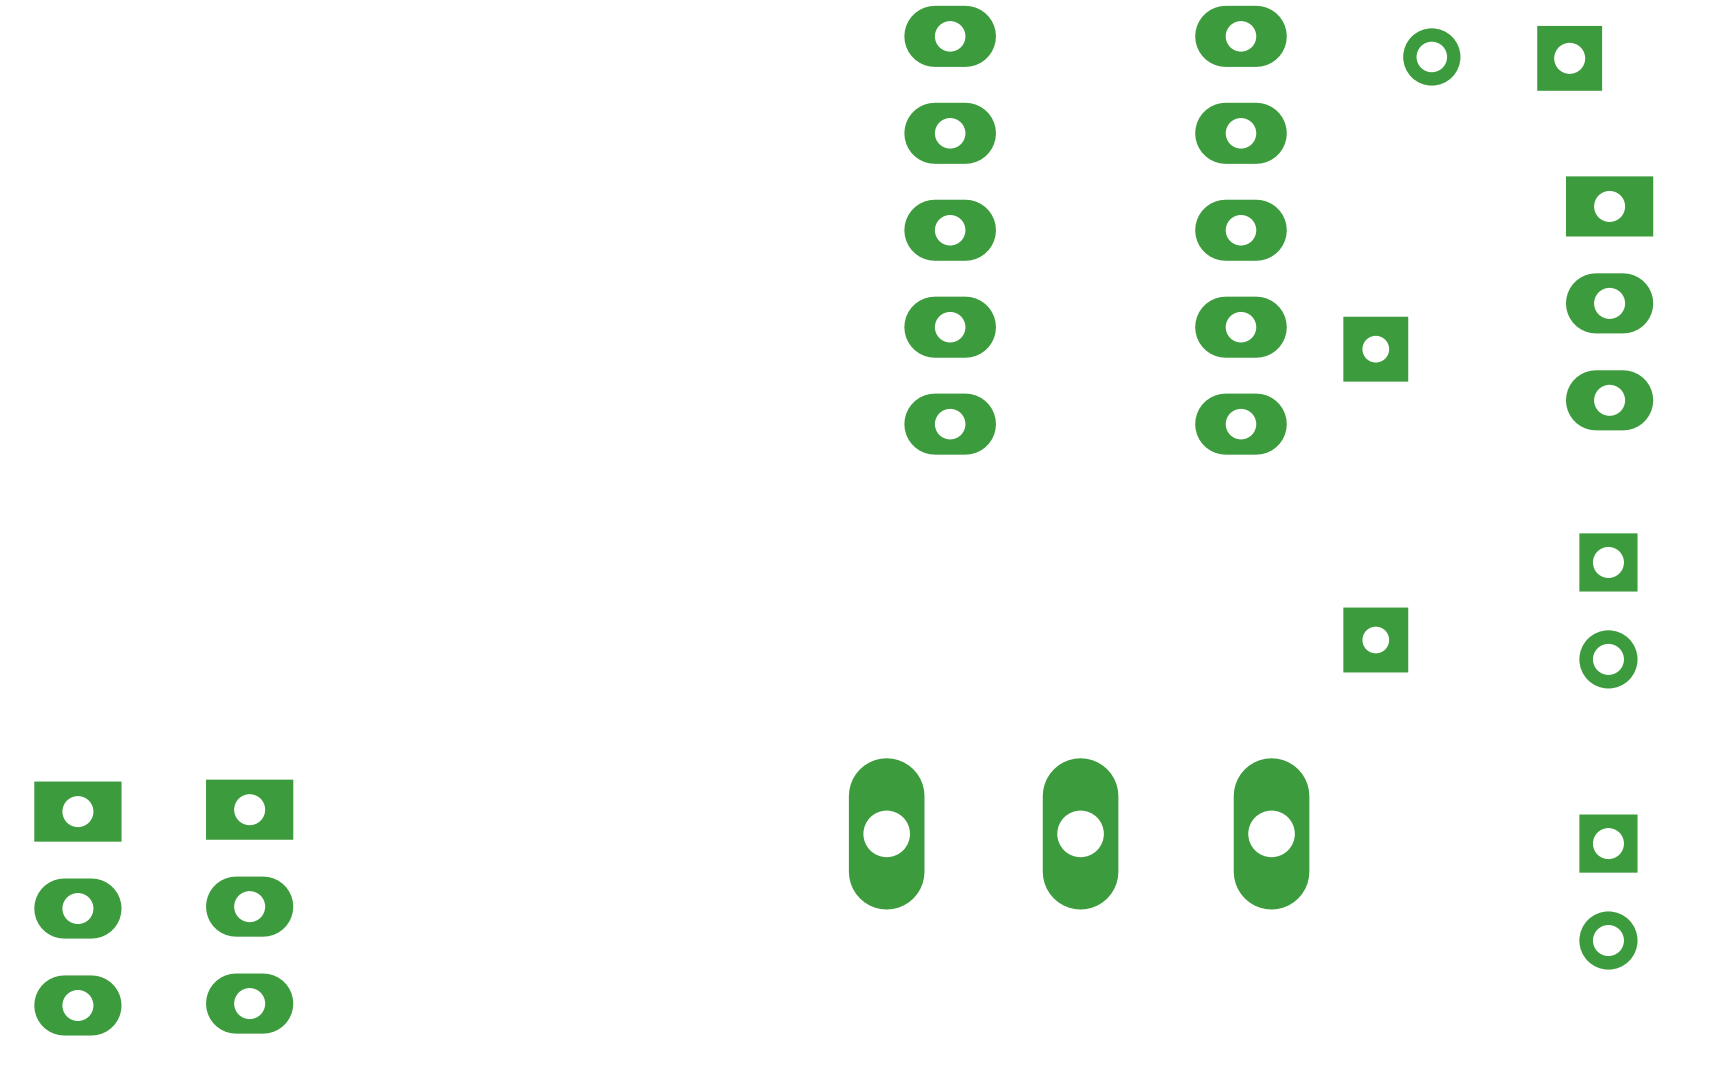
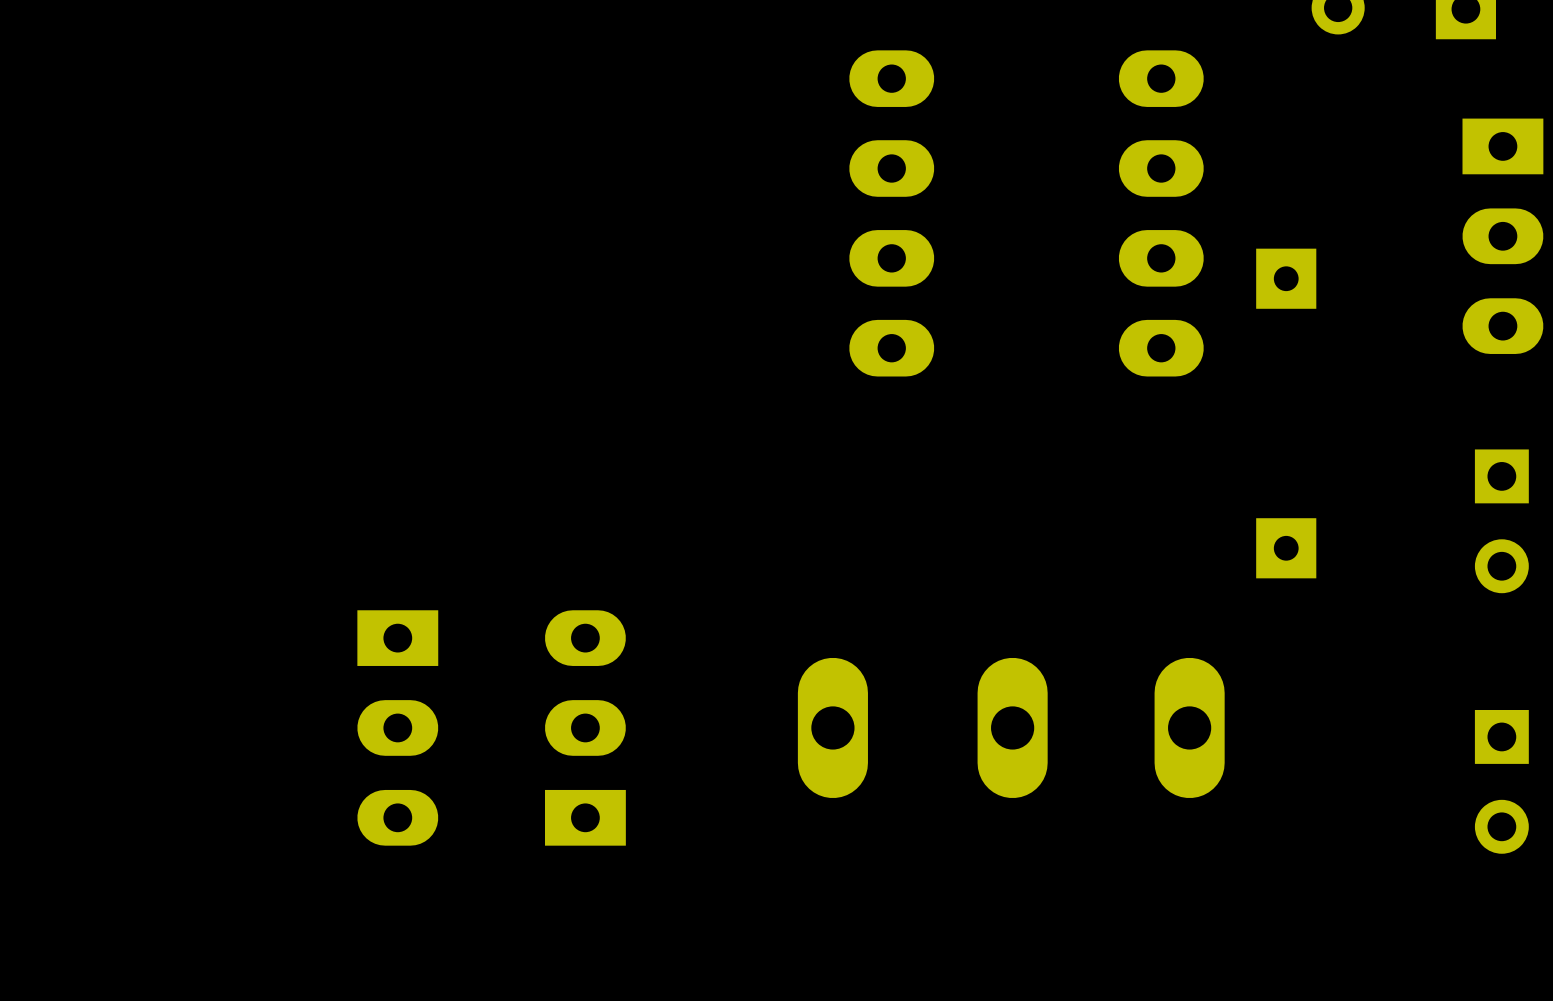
part: none -> (397, 727)
part: none -> (585, 727)
part: (249, 906) -> none
part: (77, 908) -> none

